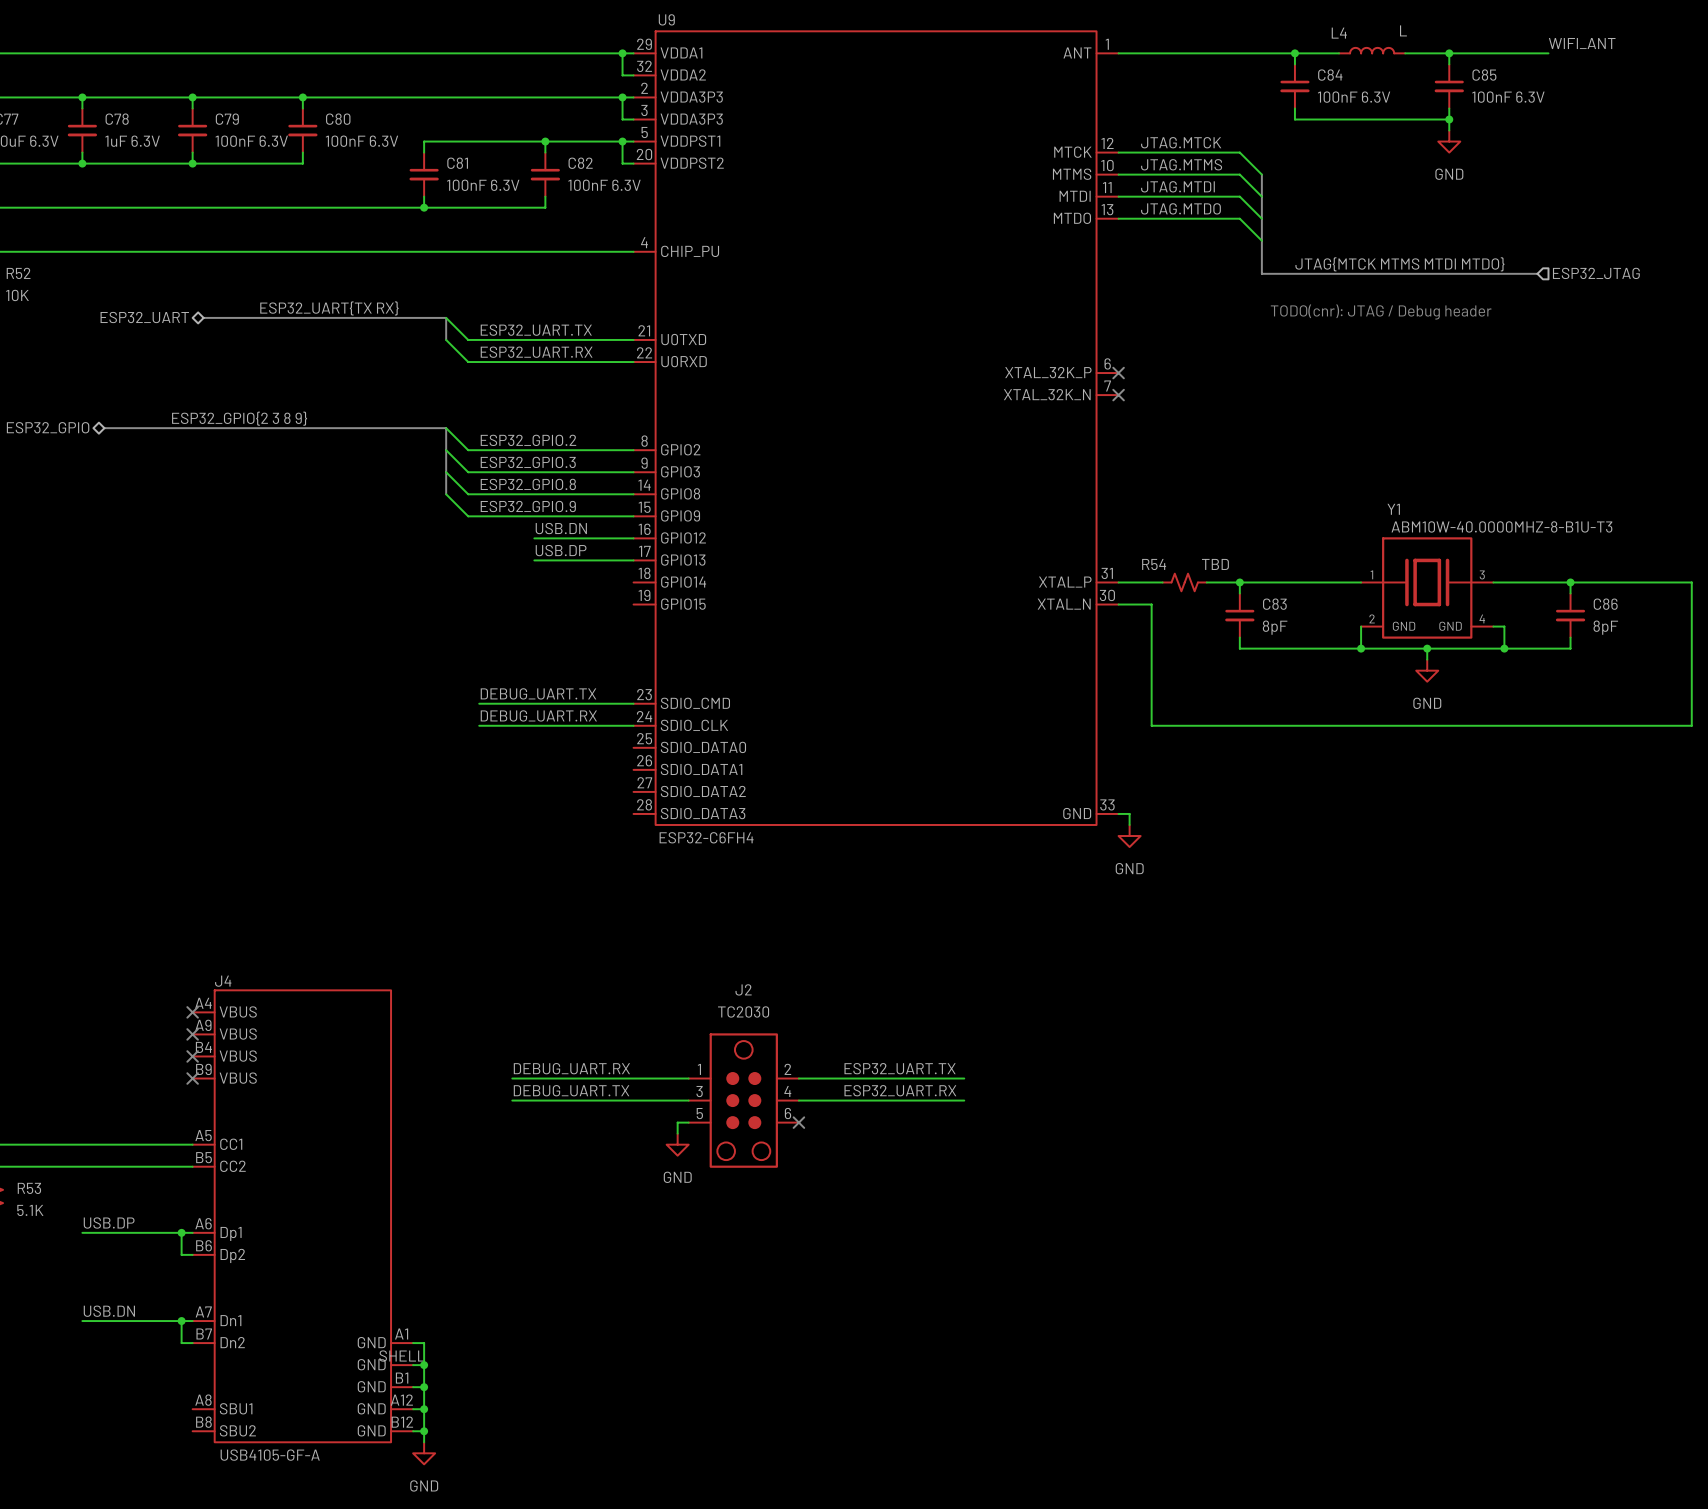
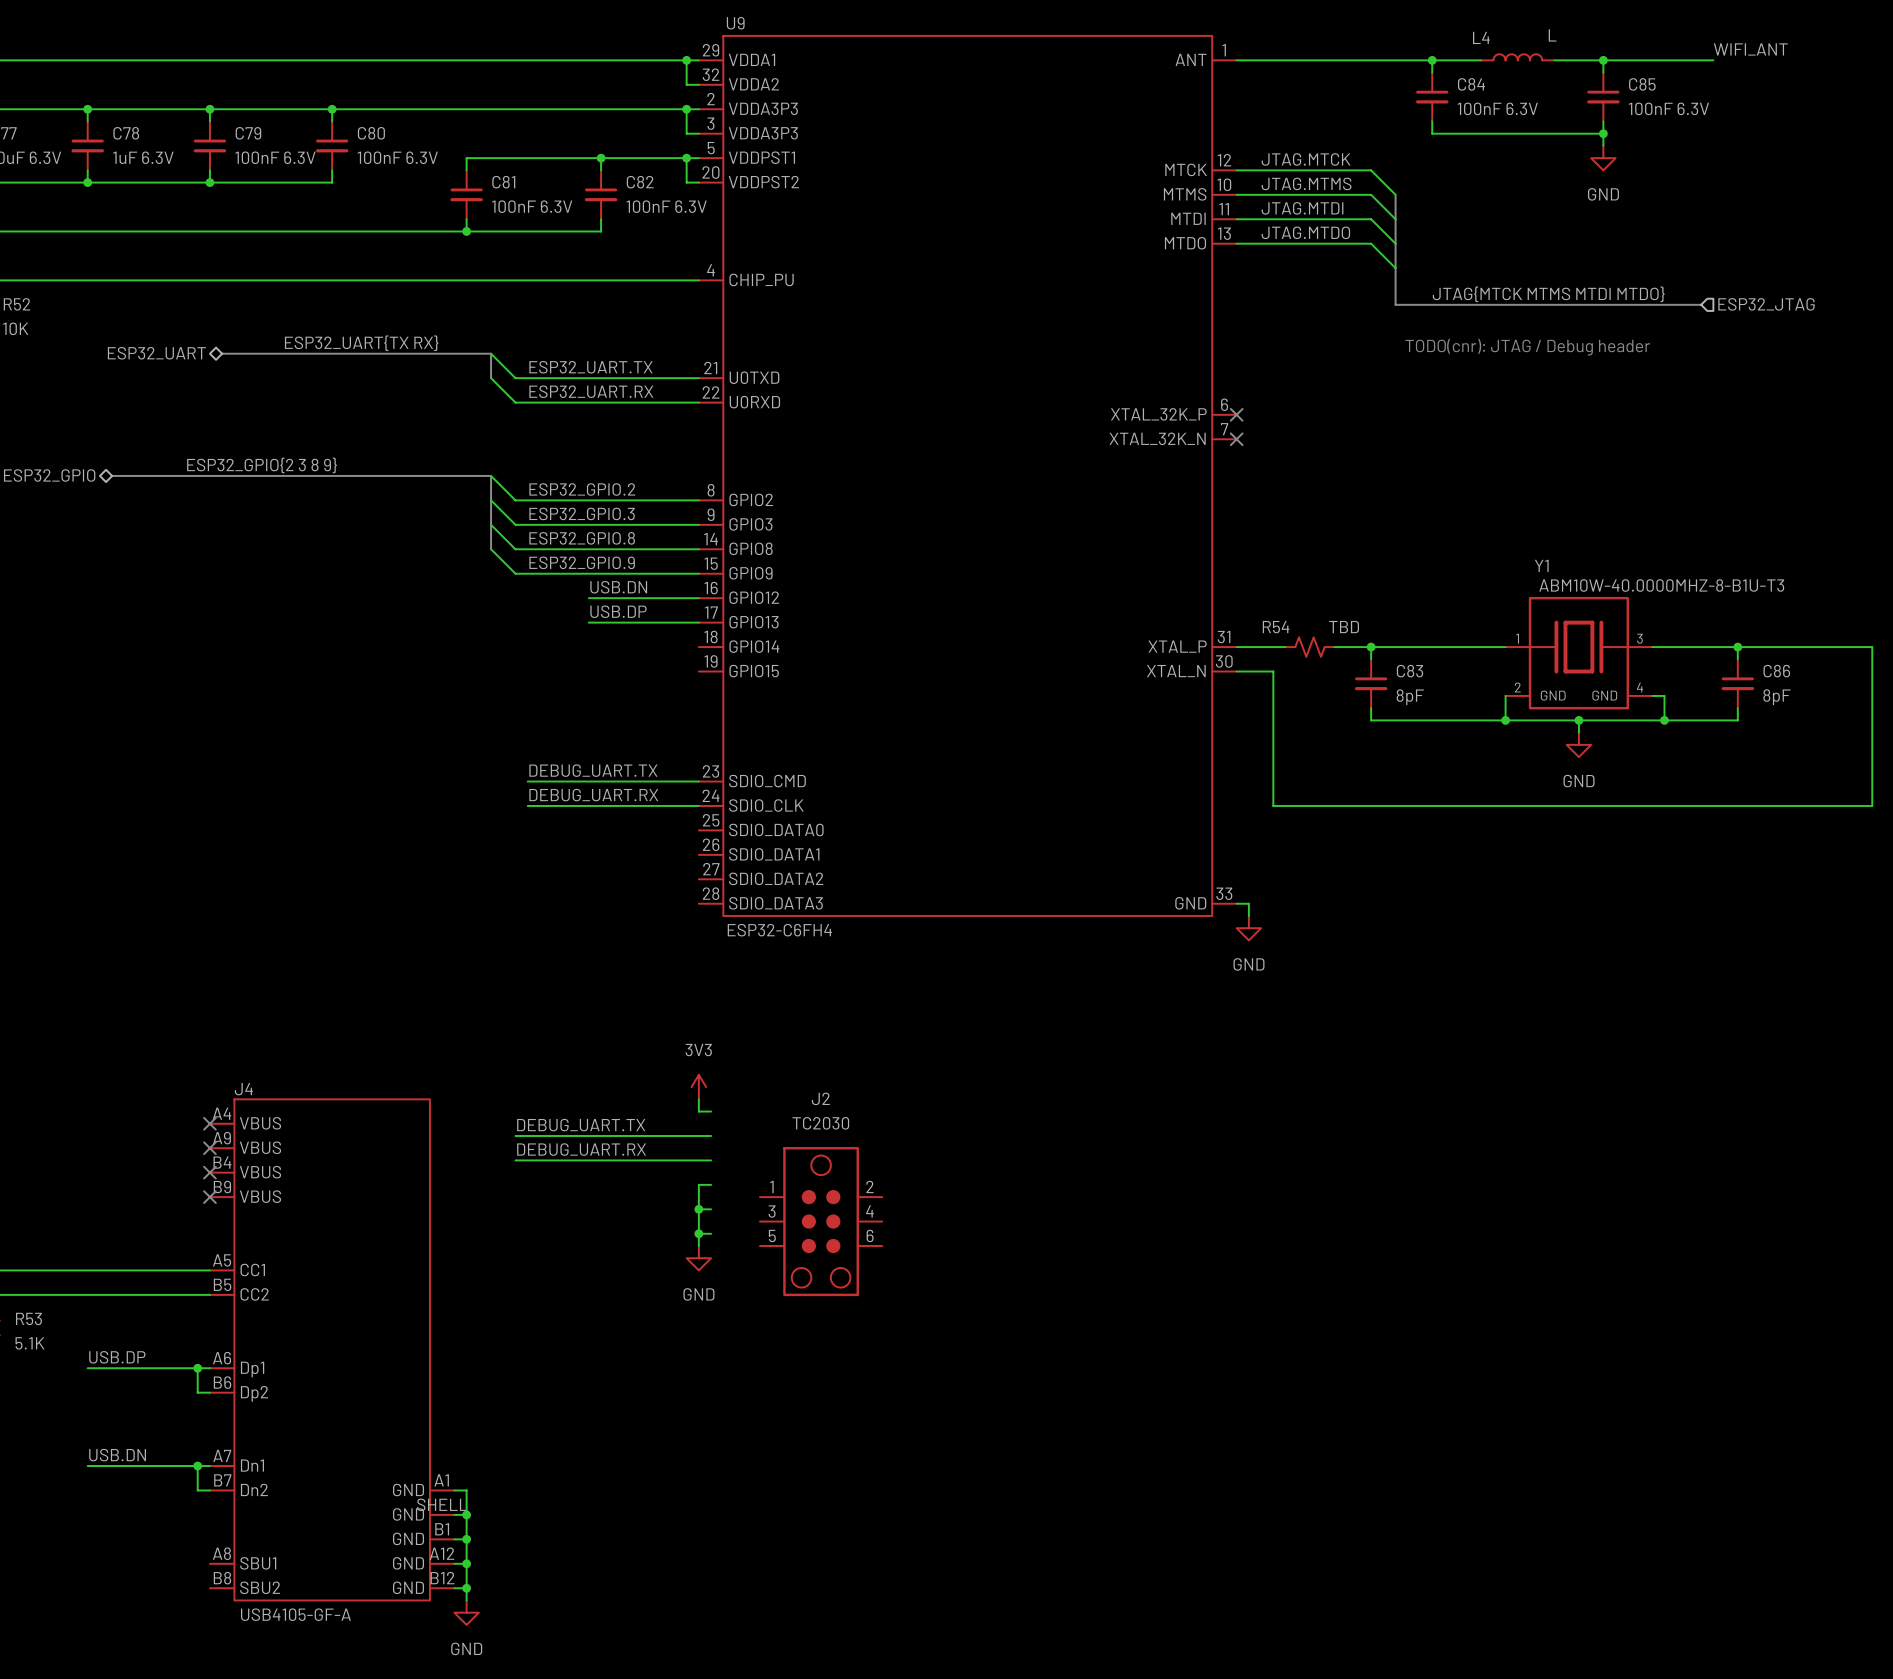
power symbol: none -> 3V3 (698, 1087)
wire: none -> (698, 1099) (698, 1111) (711, 1111)
wire: none -> (711, 1184) (698, 1184) (698, 1246)
label position: DEBUG_UART.RX (571, 1068) -> DEBUG_UART.RX (581, 1149)
label: ESP32_UART.TX (900, 1068) -> none
wire: (512, 1078) (688, 1078) -> (515, 1135) (711, 1135)
wire: (798, 1078) (964, 1078) -> none
wire: none -> (698, 1209) (711, 1209)
junction: none -> (698, 1209)
label position: DEBUG_UART.TX (571, 1090) -> DEBUG_UART.TX (581, 1125)
label: ESP32_UART.RX (900, 1090) -> none
wire: (512, 1100) (688, 1100) -> (515, 1160) (711, 1160)
wire: (798, 1100) (964, 1100) -> none
wire: none -> (698, 1233) (711, 1233)
junction: none -> (698, 1233)
wire: (688, 1122) (677, 1122) (677, 1133) -> none
no-connect mark: (798, 1122) -> none
power symbol position: GND (677, 1144) -> GND (698, 1258)

